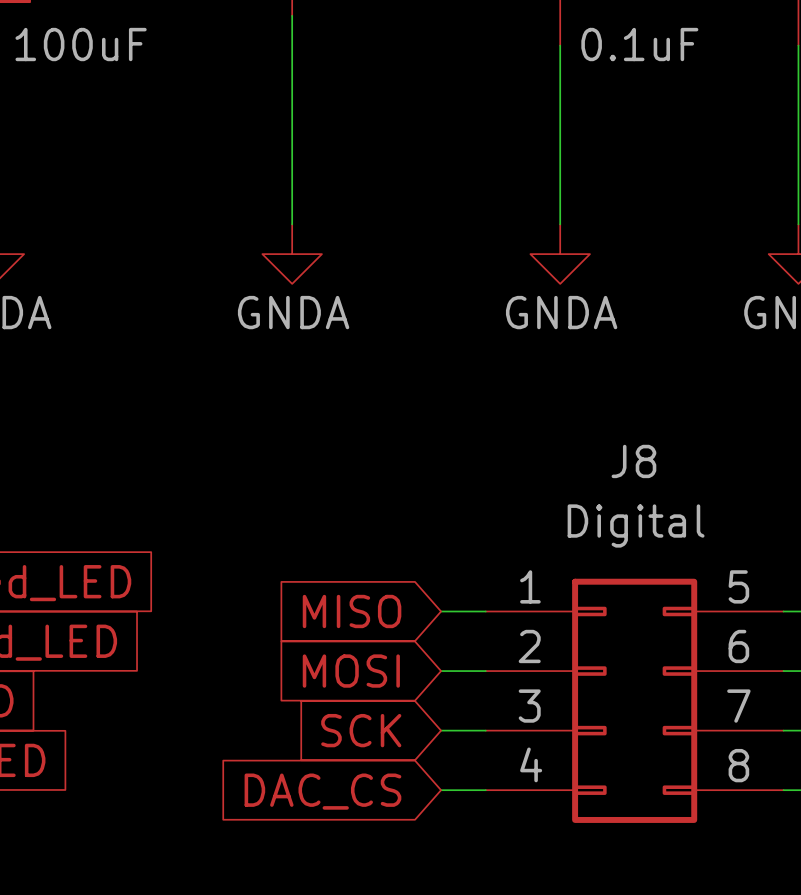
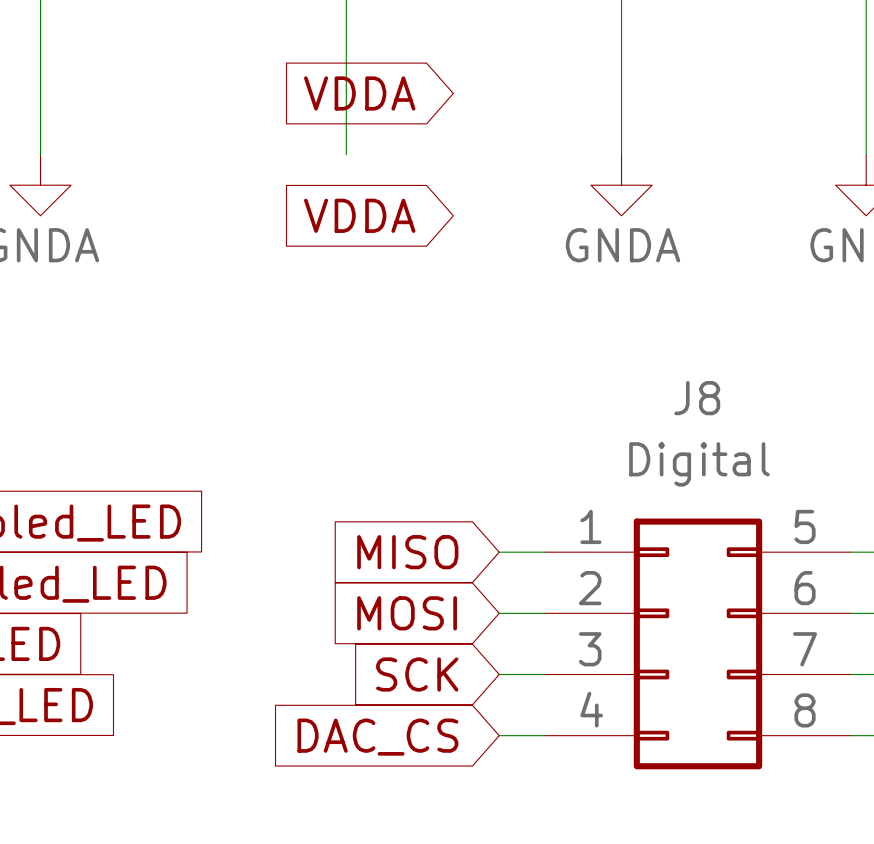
global label: none -> VDDA (359, 93)
power symbol: GNDA (292, 254) -> none
global label: none -> VDDA (359, 215)

